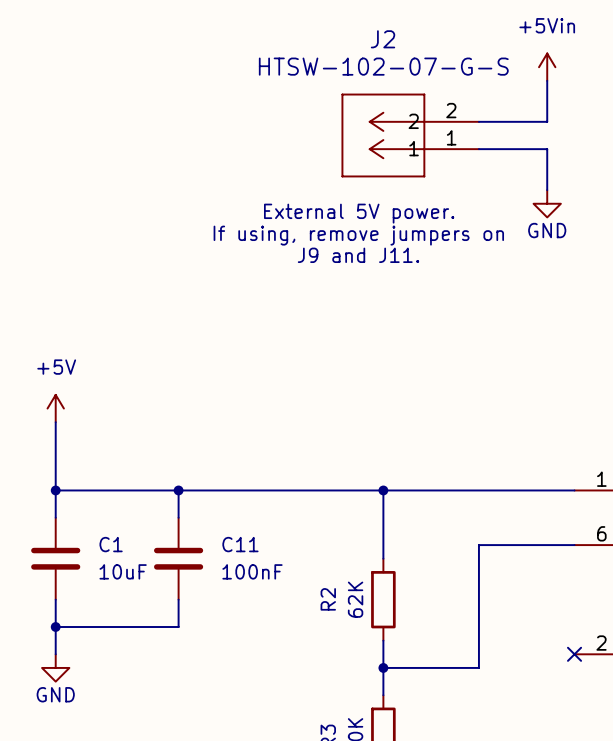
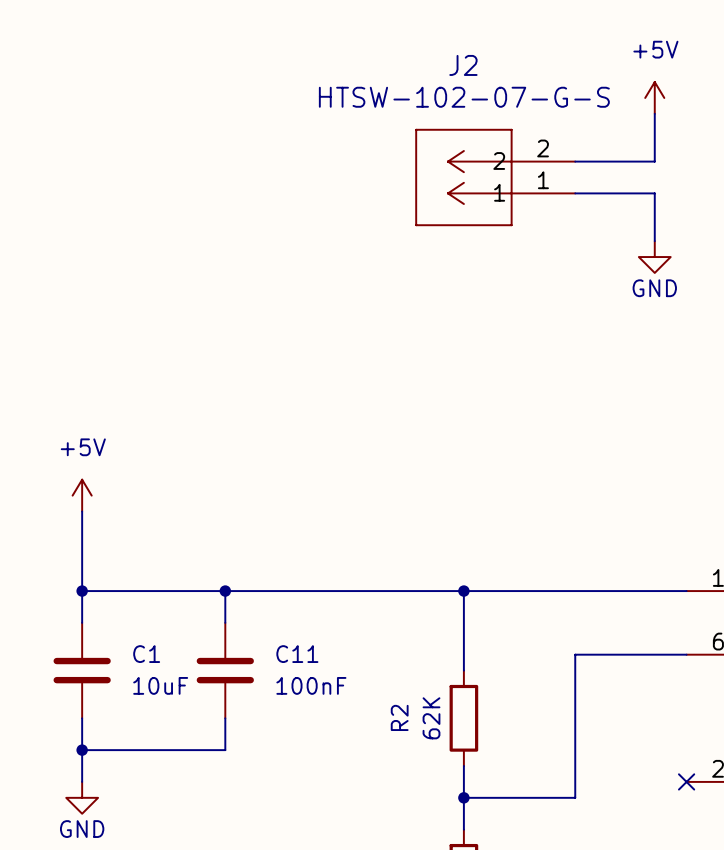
power symbol: +5Vin (547, 67) -> +5V (654, 97)
text: External 5V power. (359, 213) -> none
text: If using, remove jumpers on (358, 235) -> none
text: J9 and J11. (358, 255) -> none

